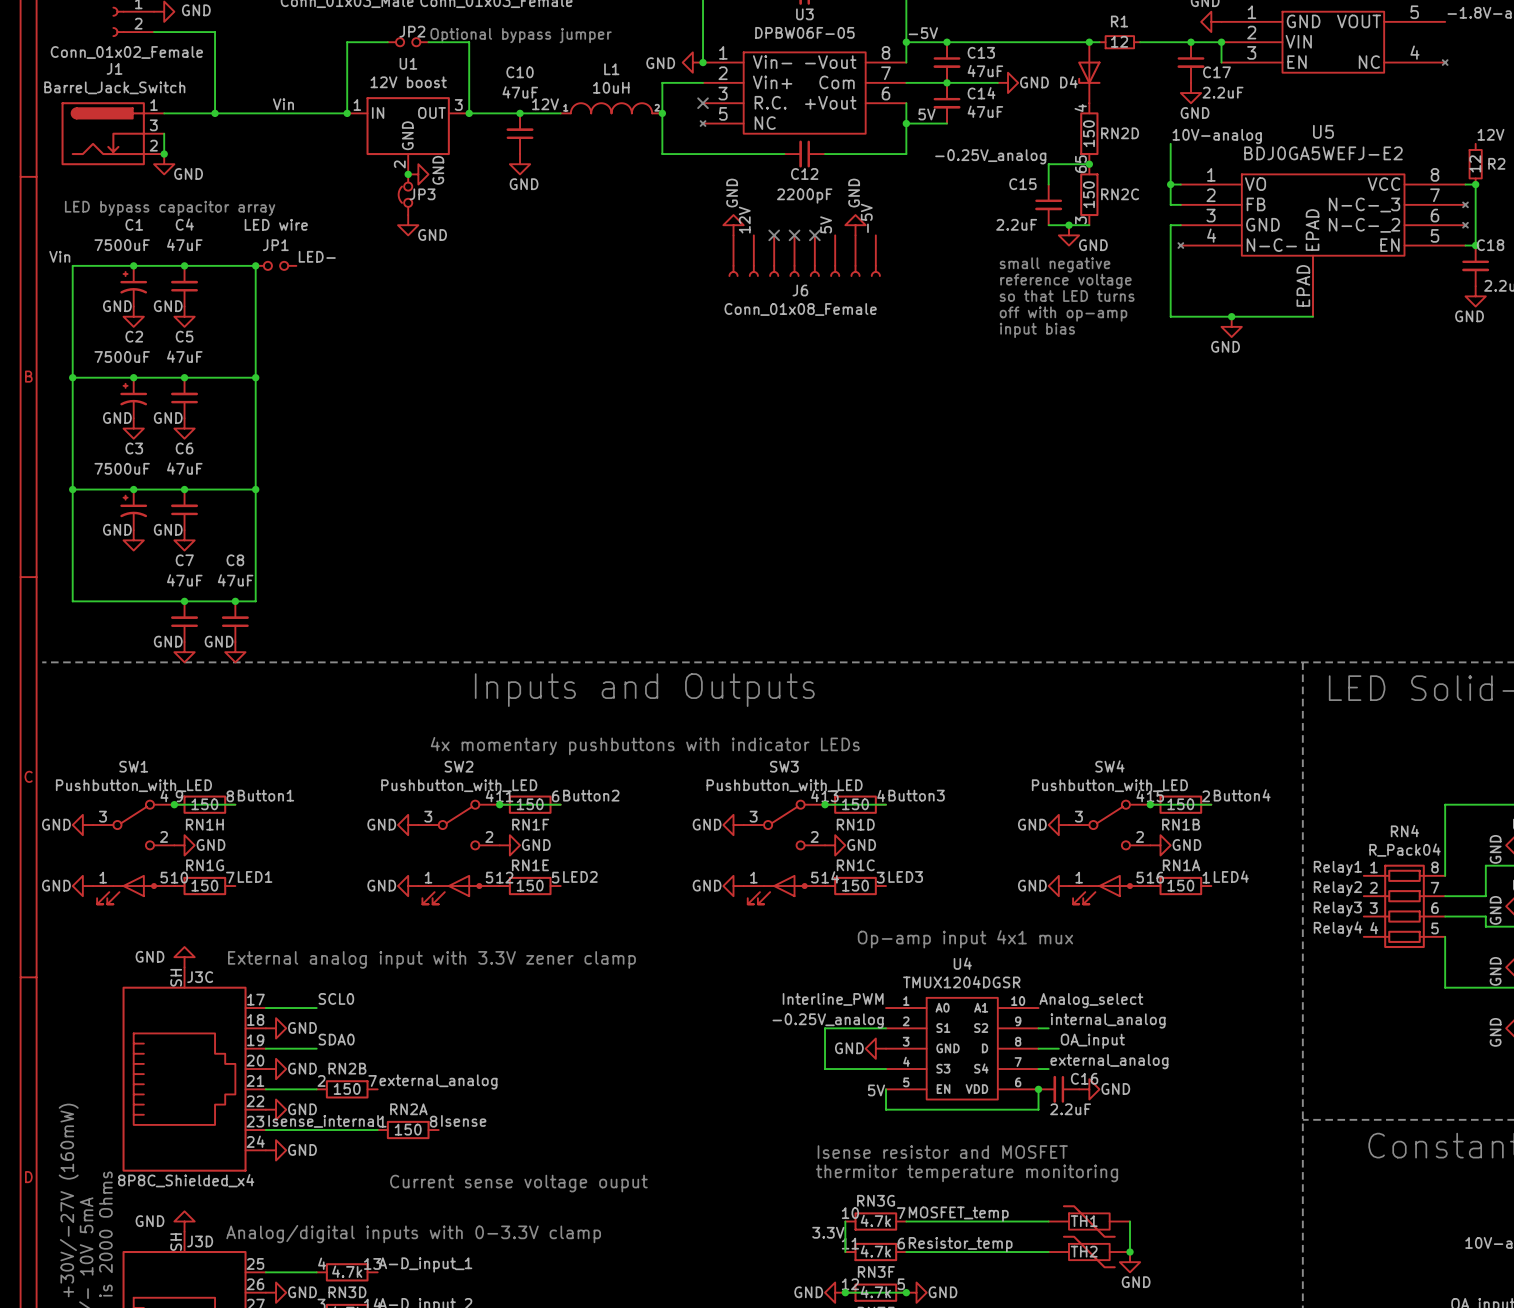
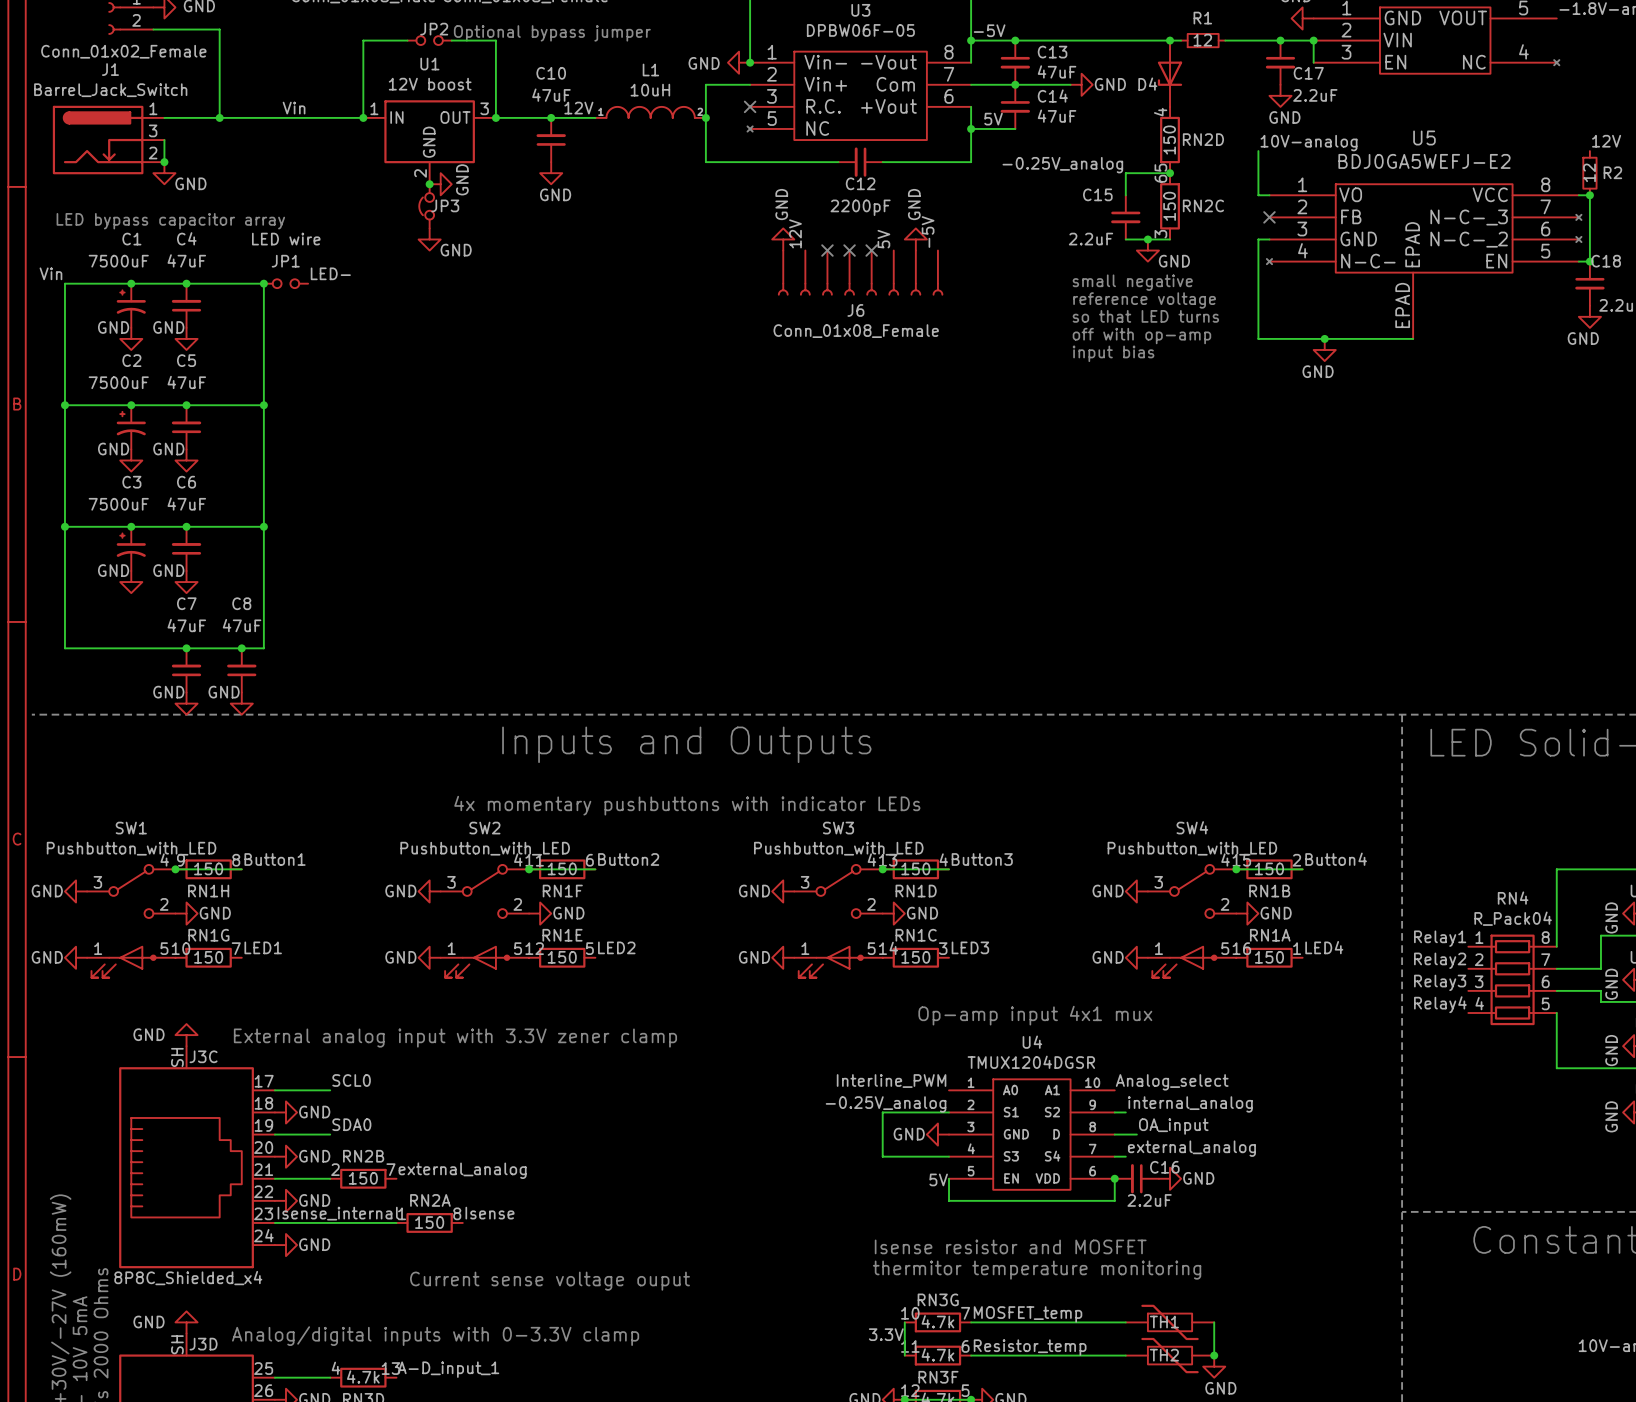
wire: (1170, 184) (1170, 204) (1180, 204) -> none
junction: (1170, 184) -> none
no-connect mark: none -> (1269, 217)

